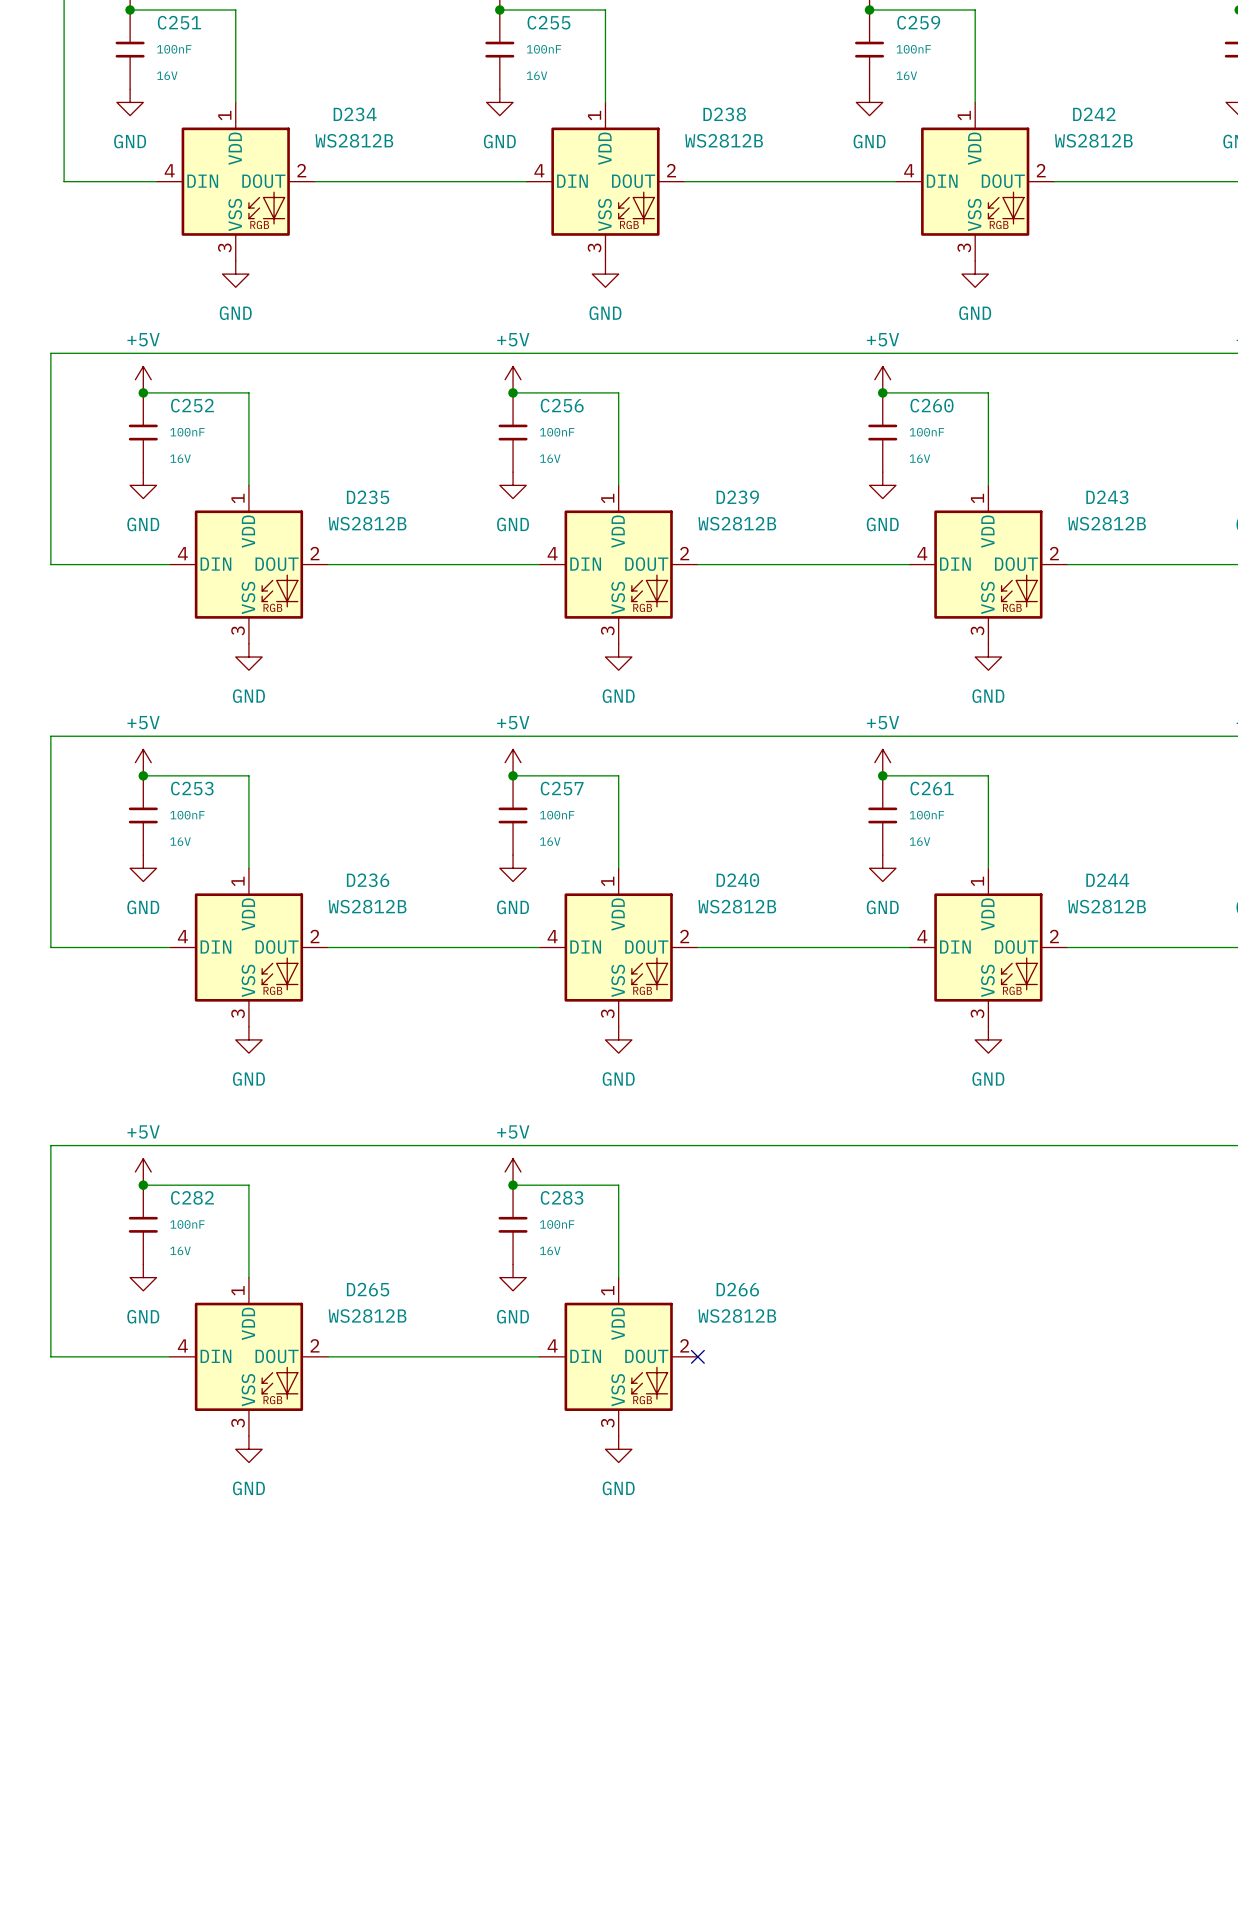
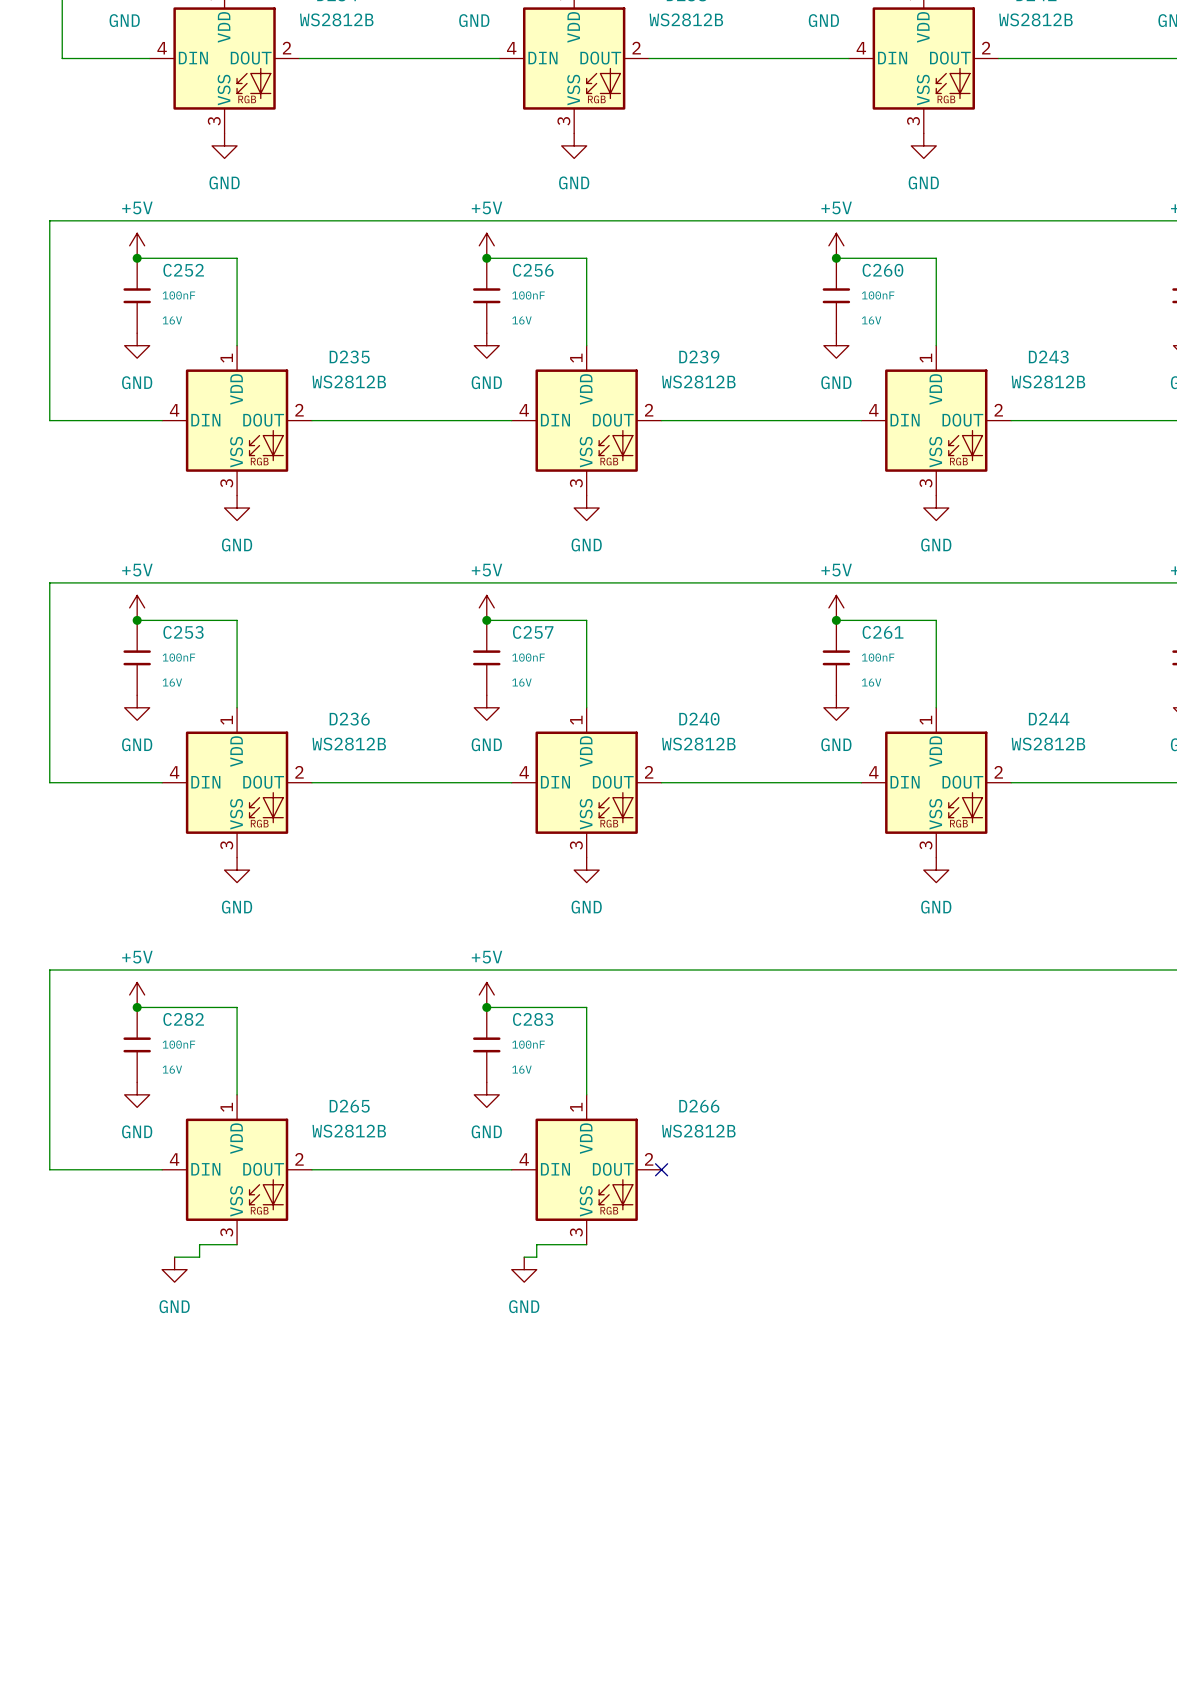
wire: none -> (237, 1244) (199, 1244) (199, 1257) (174, 1257)
wire: none -> (586, 1244) (536, 1244) (536, 1257) (524, 1257)
power symbol position: GND (248, 1449) -> GND (174, 1269)
power symbol position: GND (618, 1449) -> GND (524, 1269)

